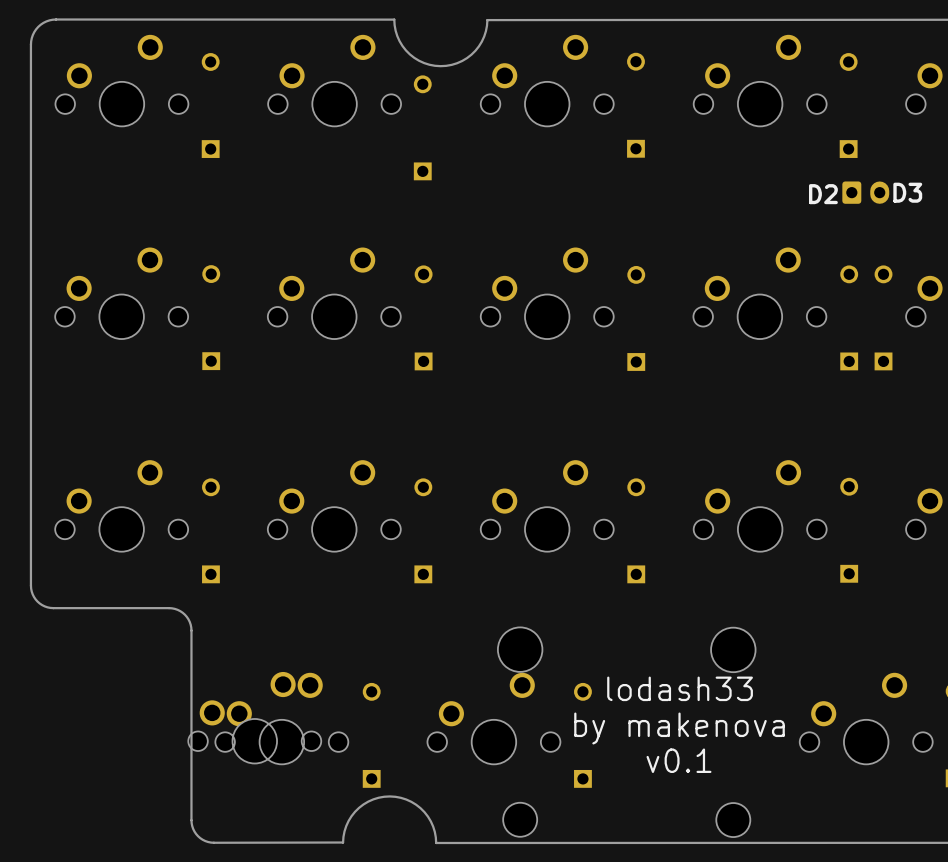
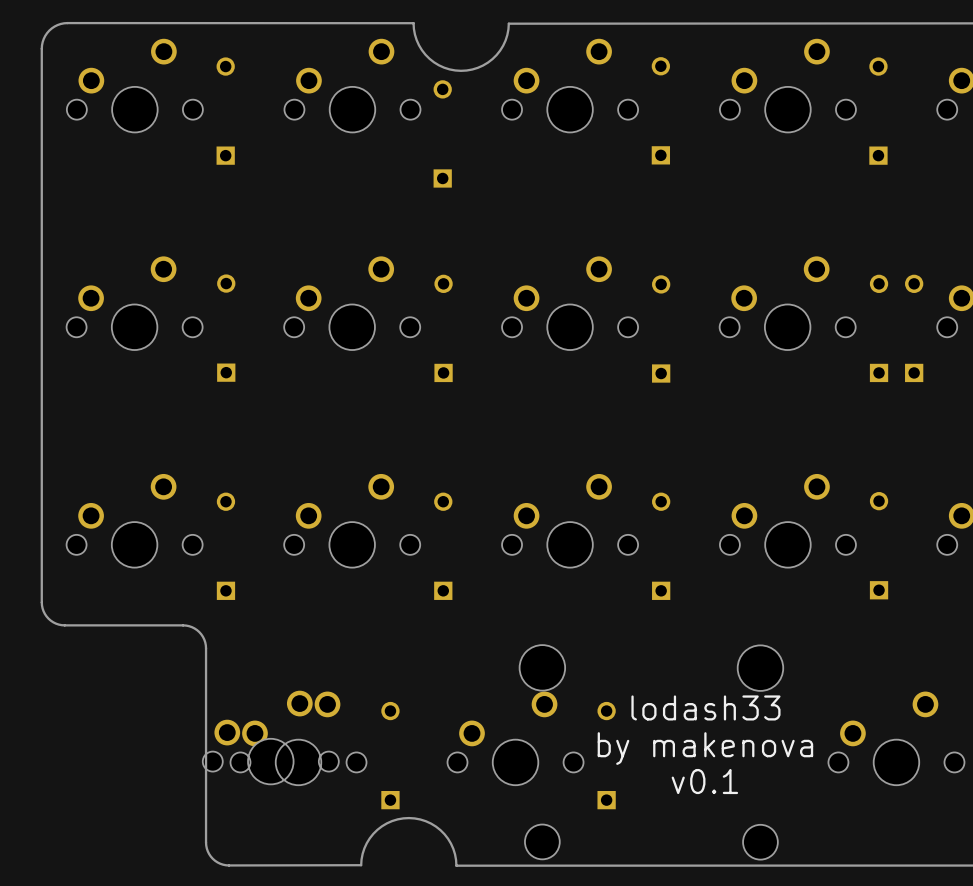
part: (865, 192) -> none
text: D3 (907, 192) -> none
text: D2 (823, 194) -> none

